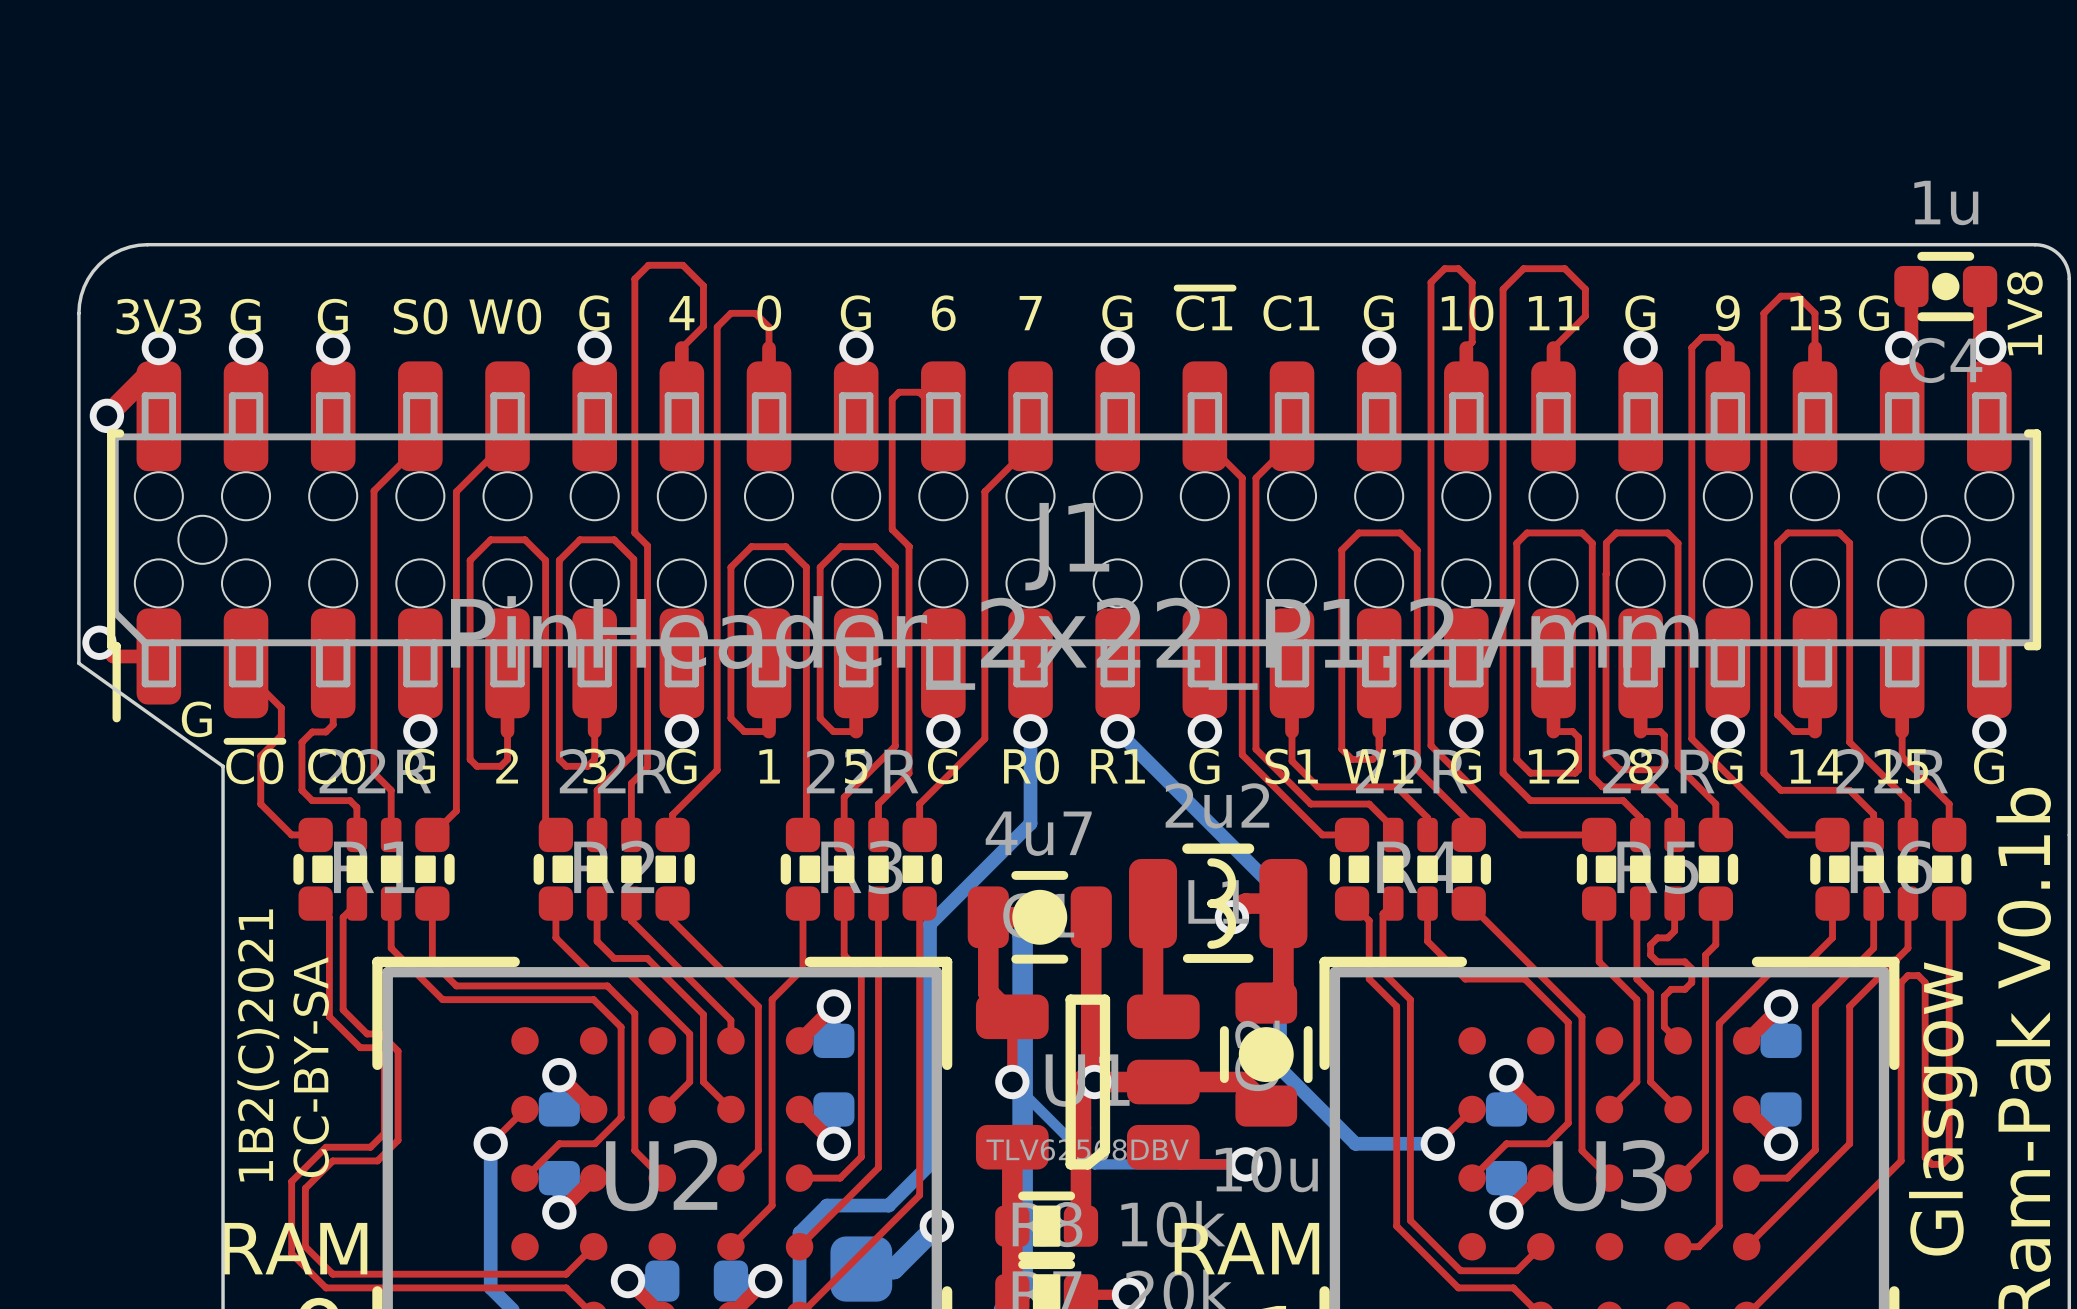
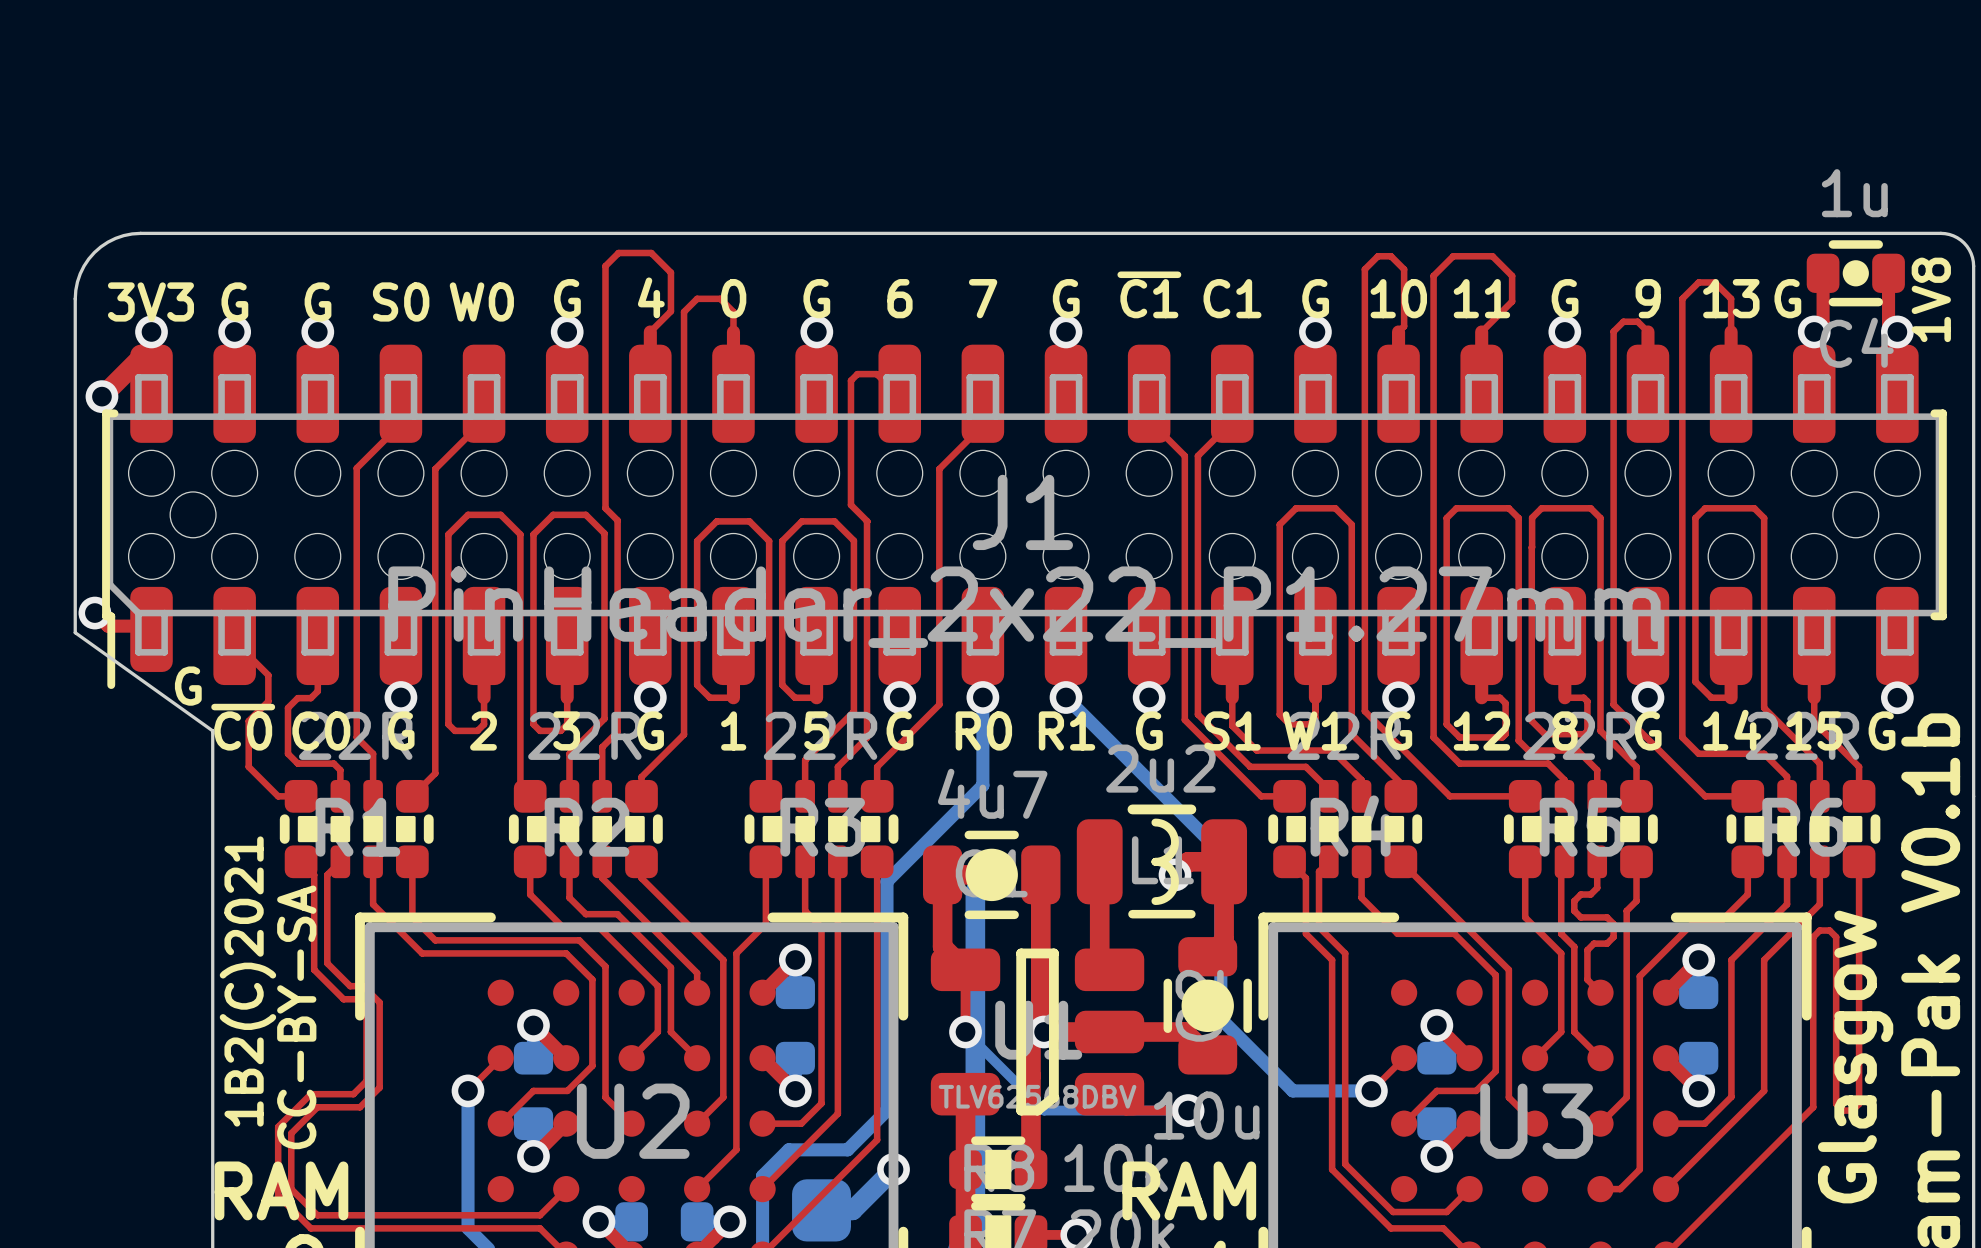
J1 footprint: [107, 361, 2042, 723] -> [102, 344, 1947, 689]
text position: G (1988, 766) -> G (1881, 730)

